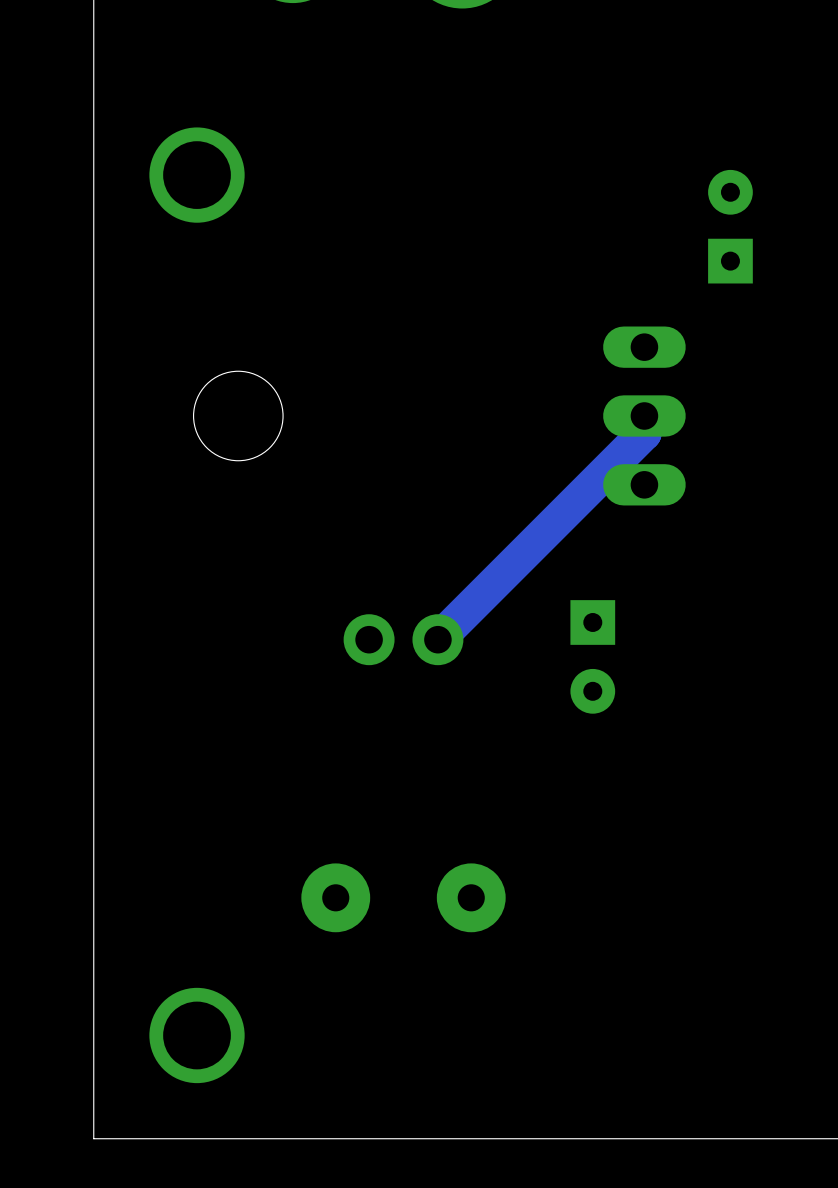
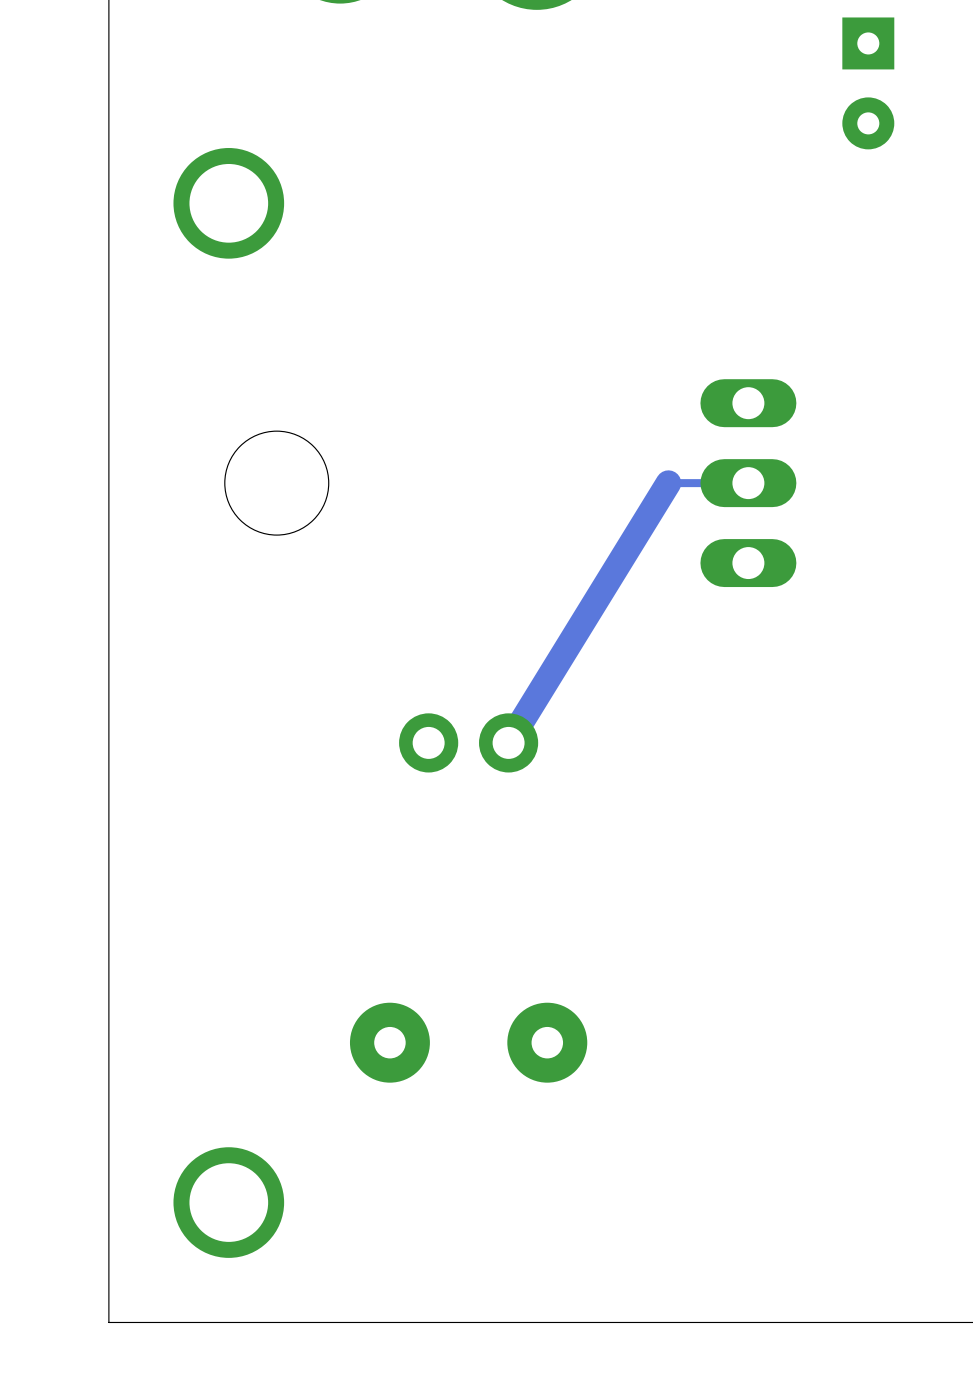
part rotation: 0° (730, 226) -> 180° (868, 83)
part position: (730, 226) -> (868, 83)
track: (644, 415) (644, 433) (437, 639) -> (748, 483) (668, 483) (508, 742)
part: (592, 656) -> none

